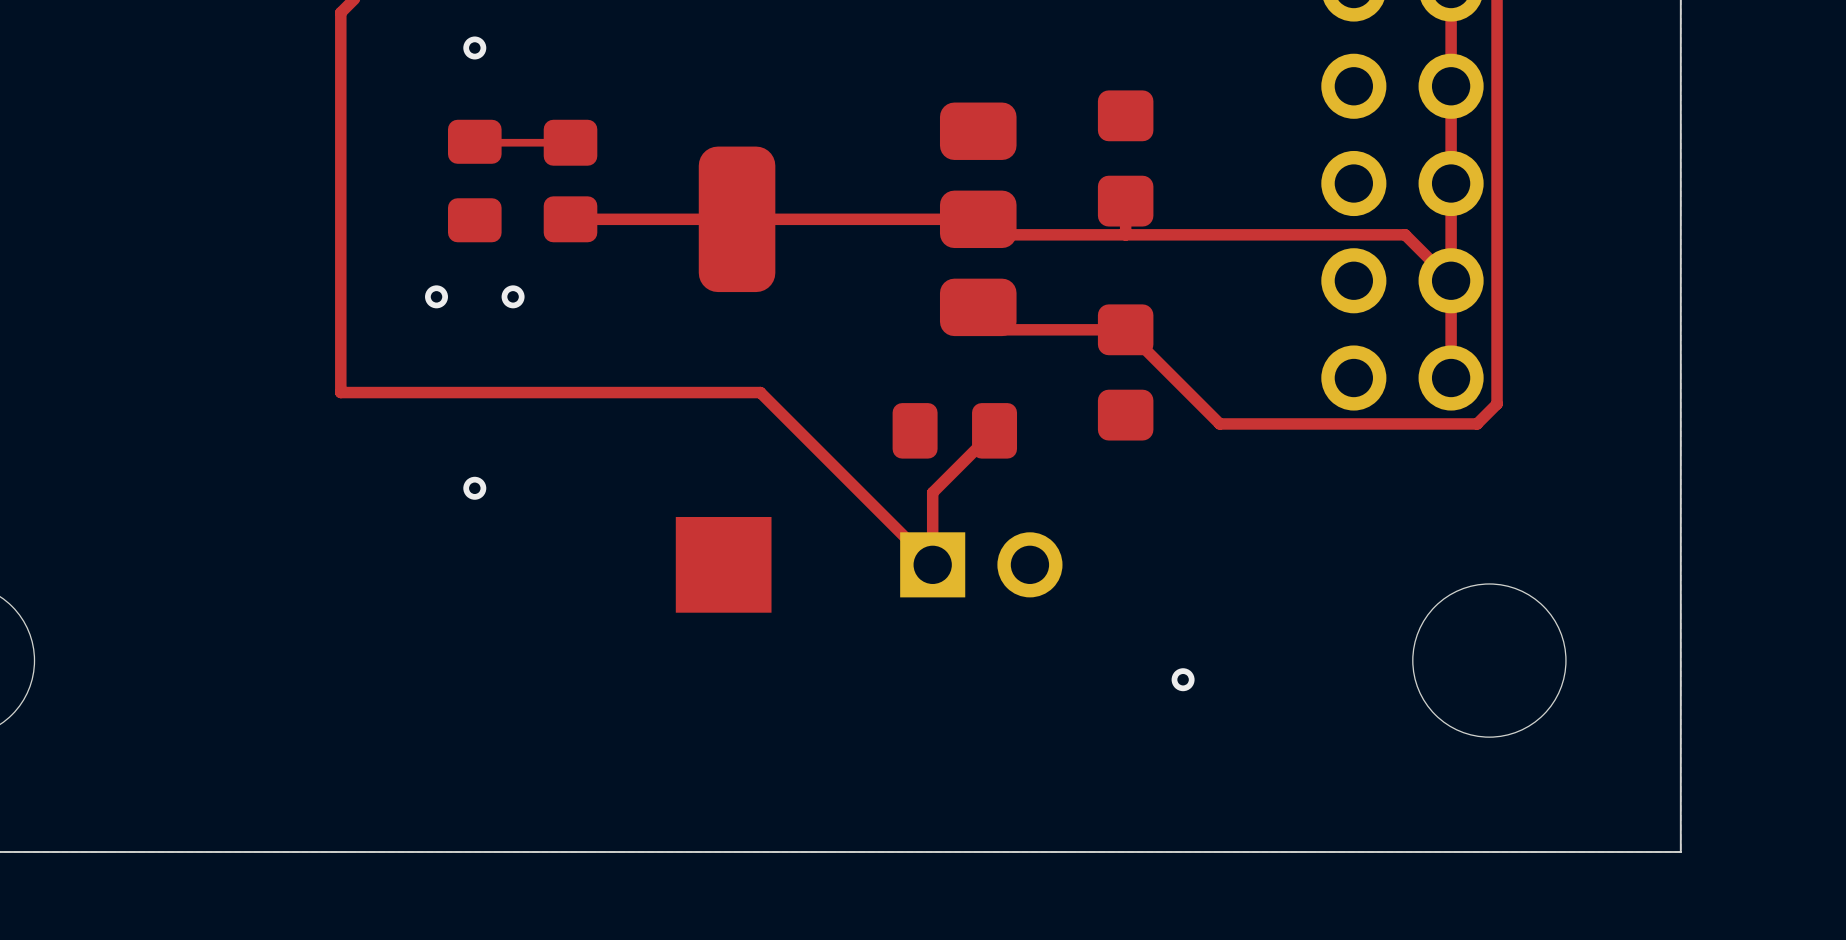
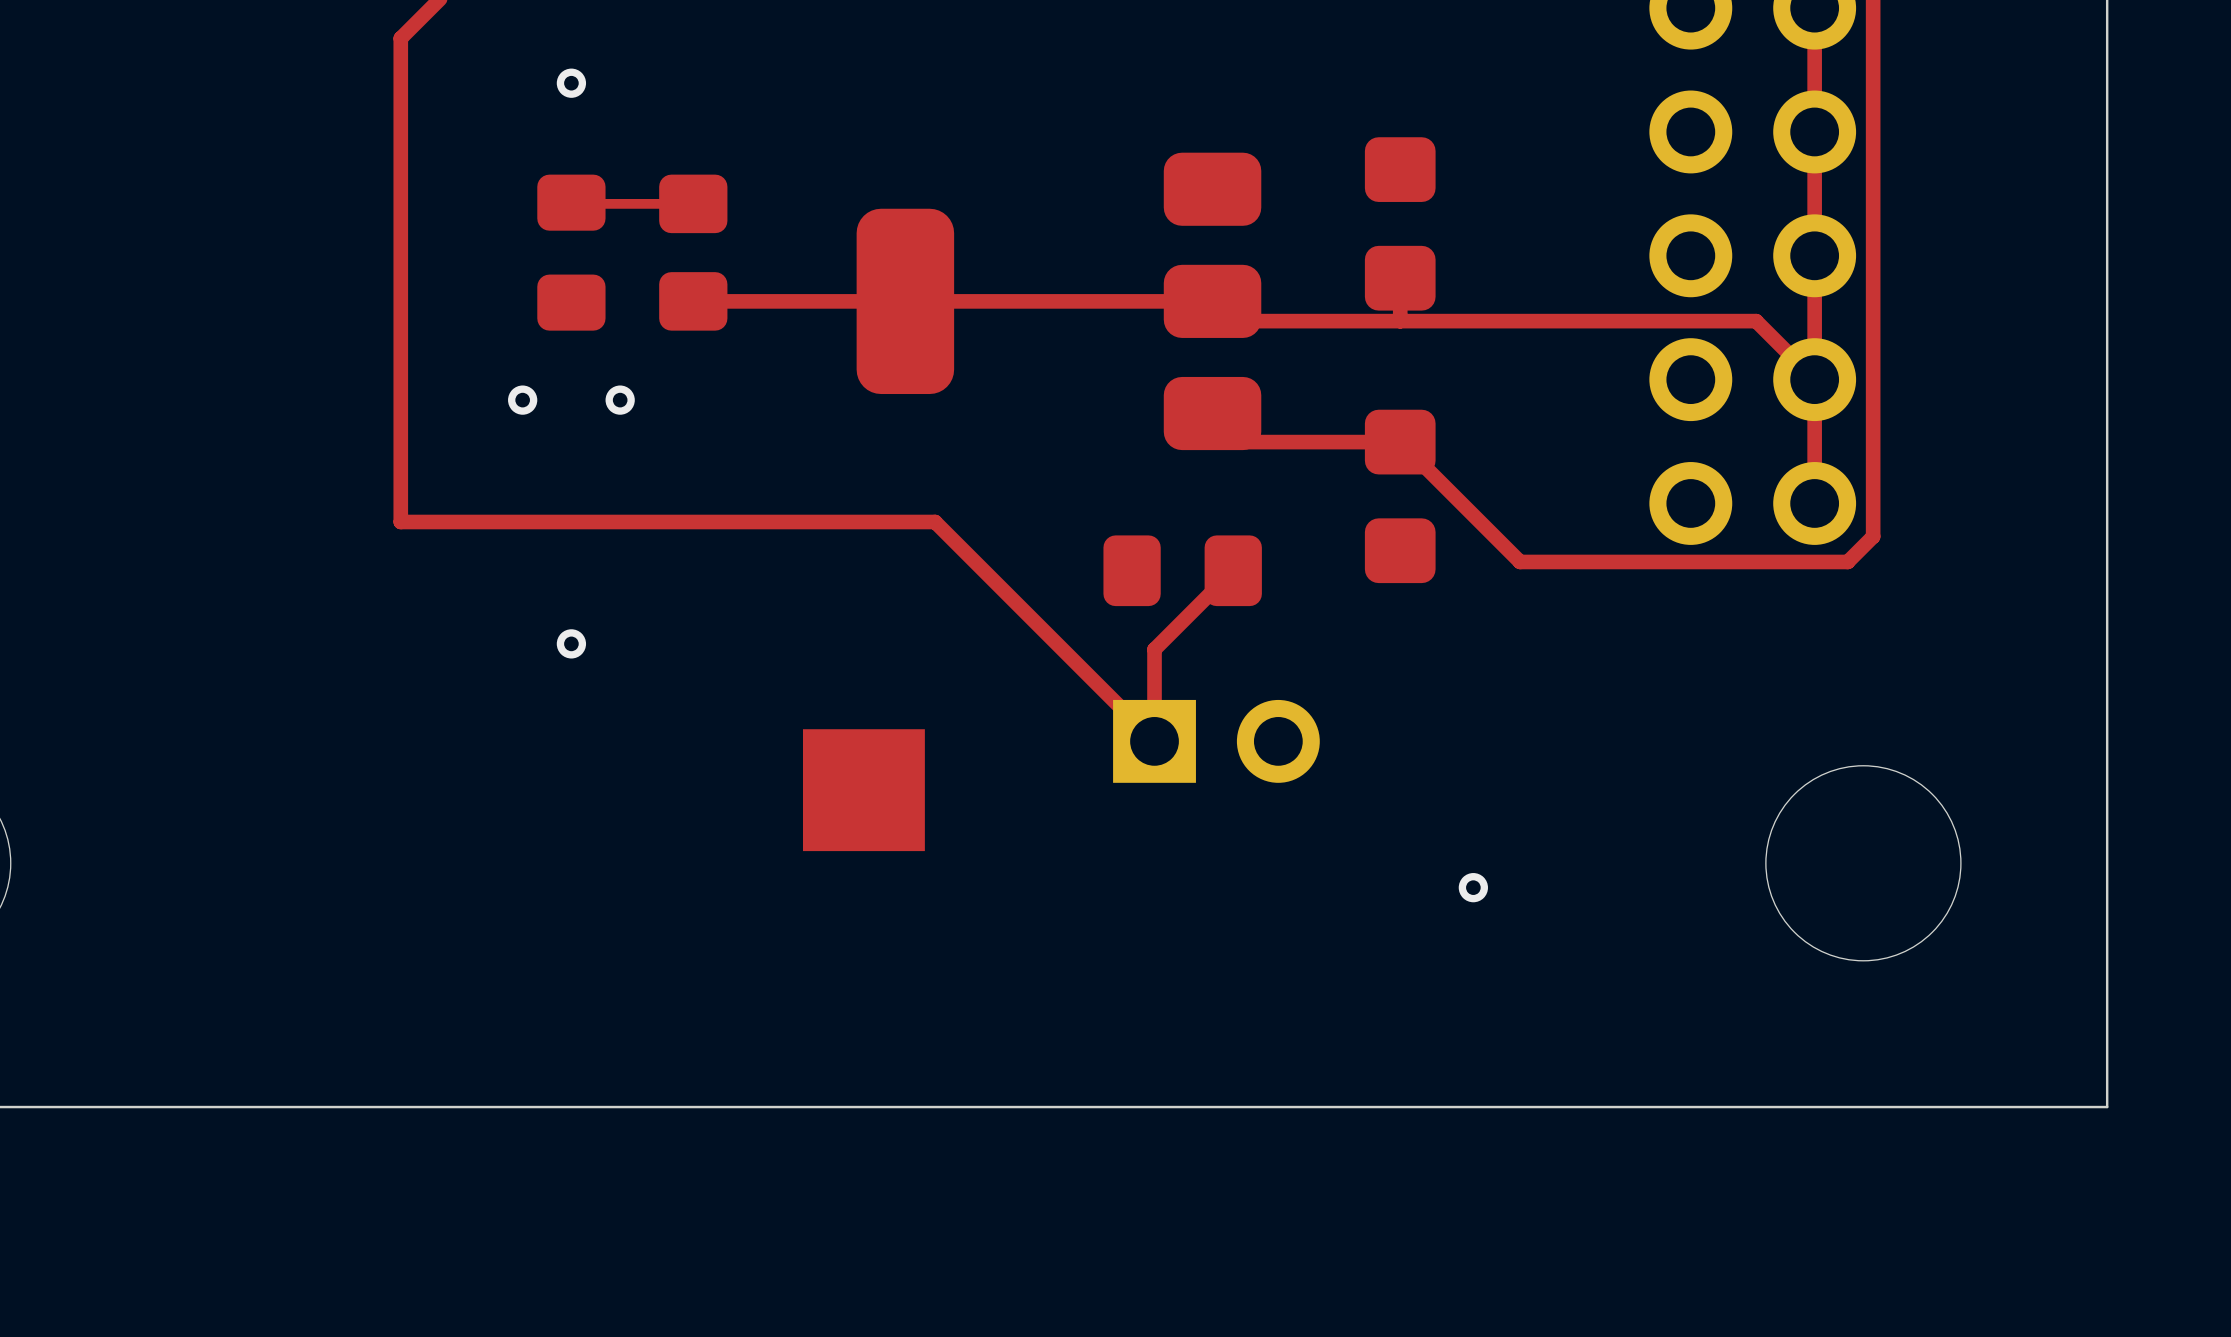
part position: (723, 564) -> (863, 790)

